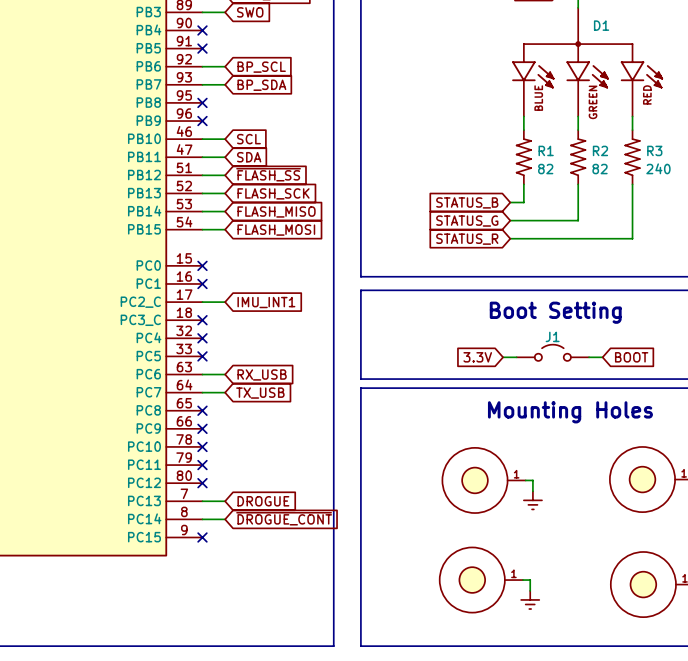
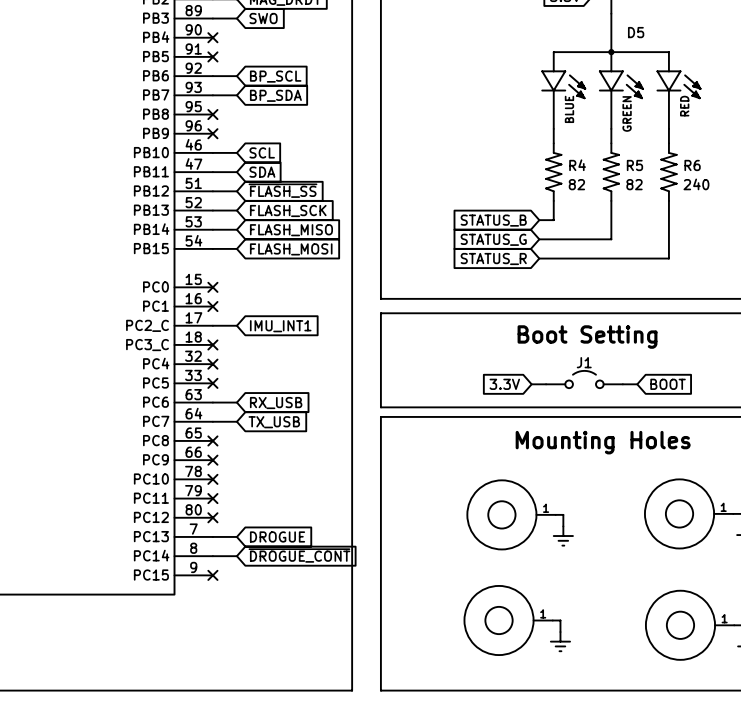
D1 name: D1 (601, 25) -> D5 (636, 32)
R1 name: R1 (546, 150) -> R4 (577, 165)
R2 name: R2 (600, 150) -> R5 (634, 165)
R3 name: R3 (654, 150) -> R6 (692, 165)

